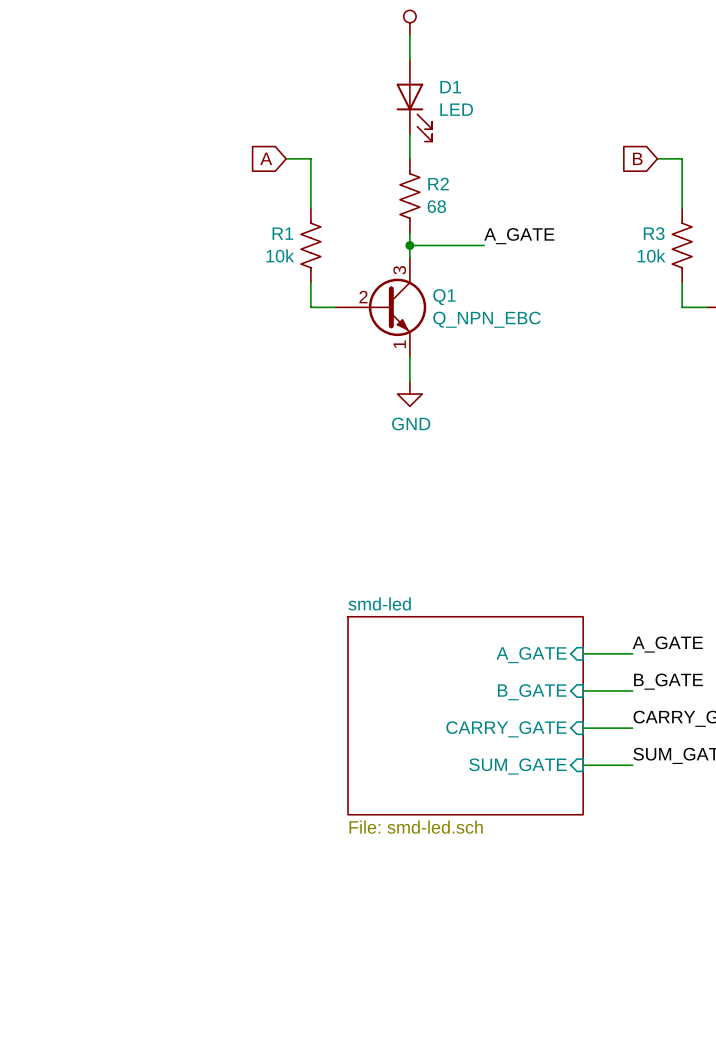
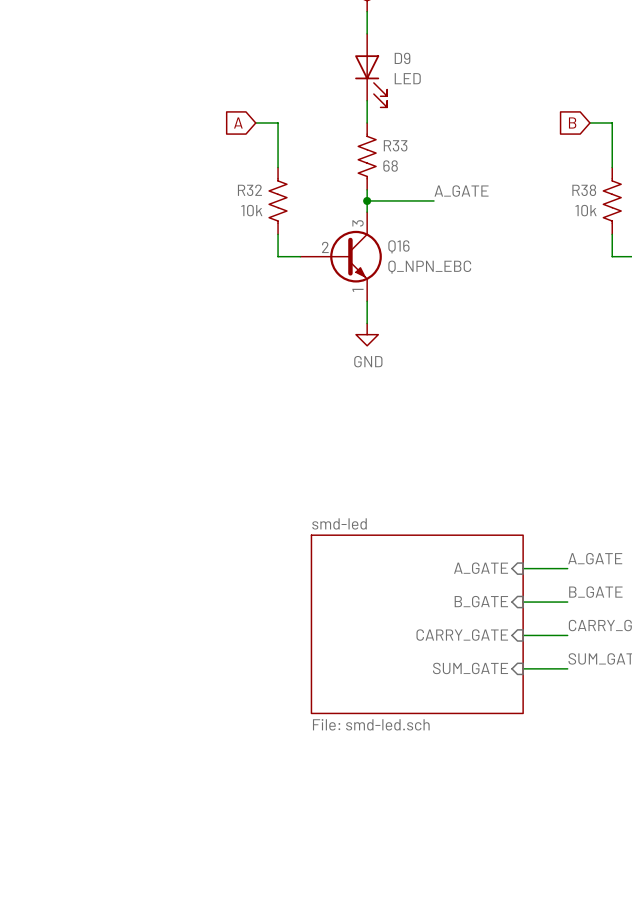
D1 name: D1 (450, 87) -> D9 (402, 58)
R2 name: R2 (438, 184) -> R33 (395, 145)
R1 name: R1 (282, 233) -> R32 (249, 190)
R3 name: R3 (654, 233) -> R38 (584, 190)
Q1 name: Q1 (444, 297) -> Q16 (398, 246)

